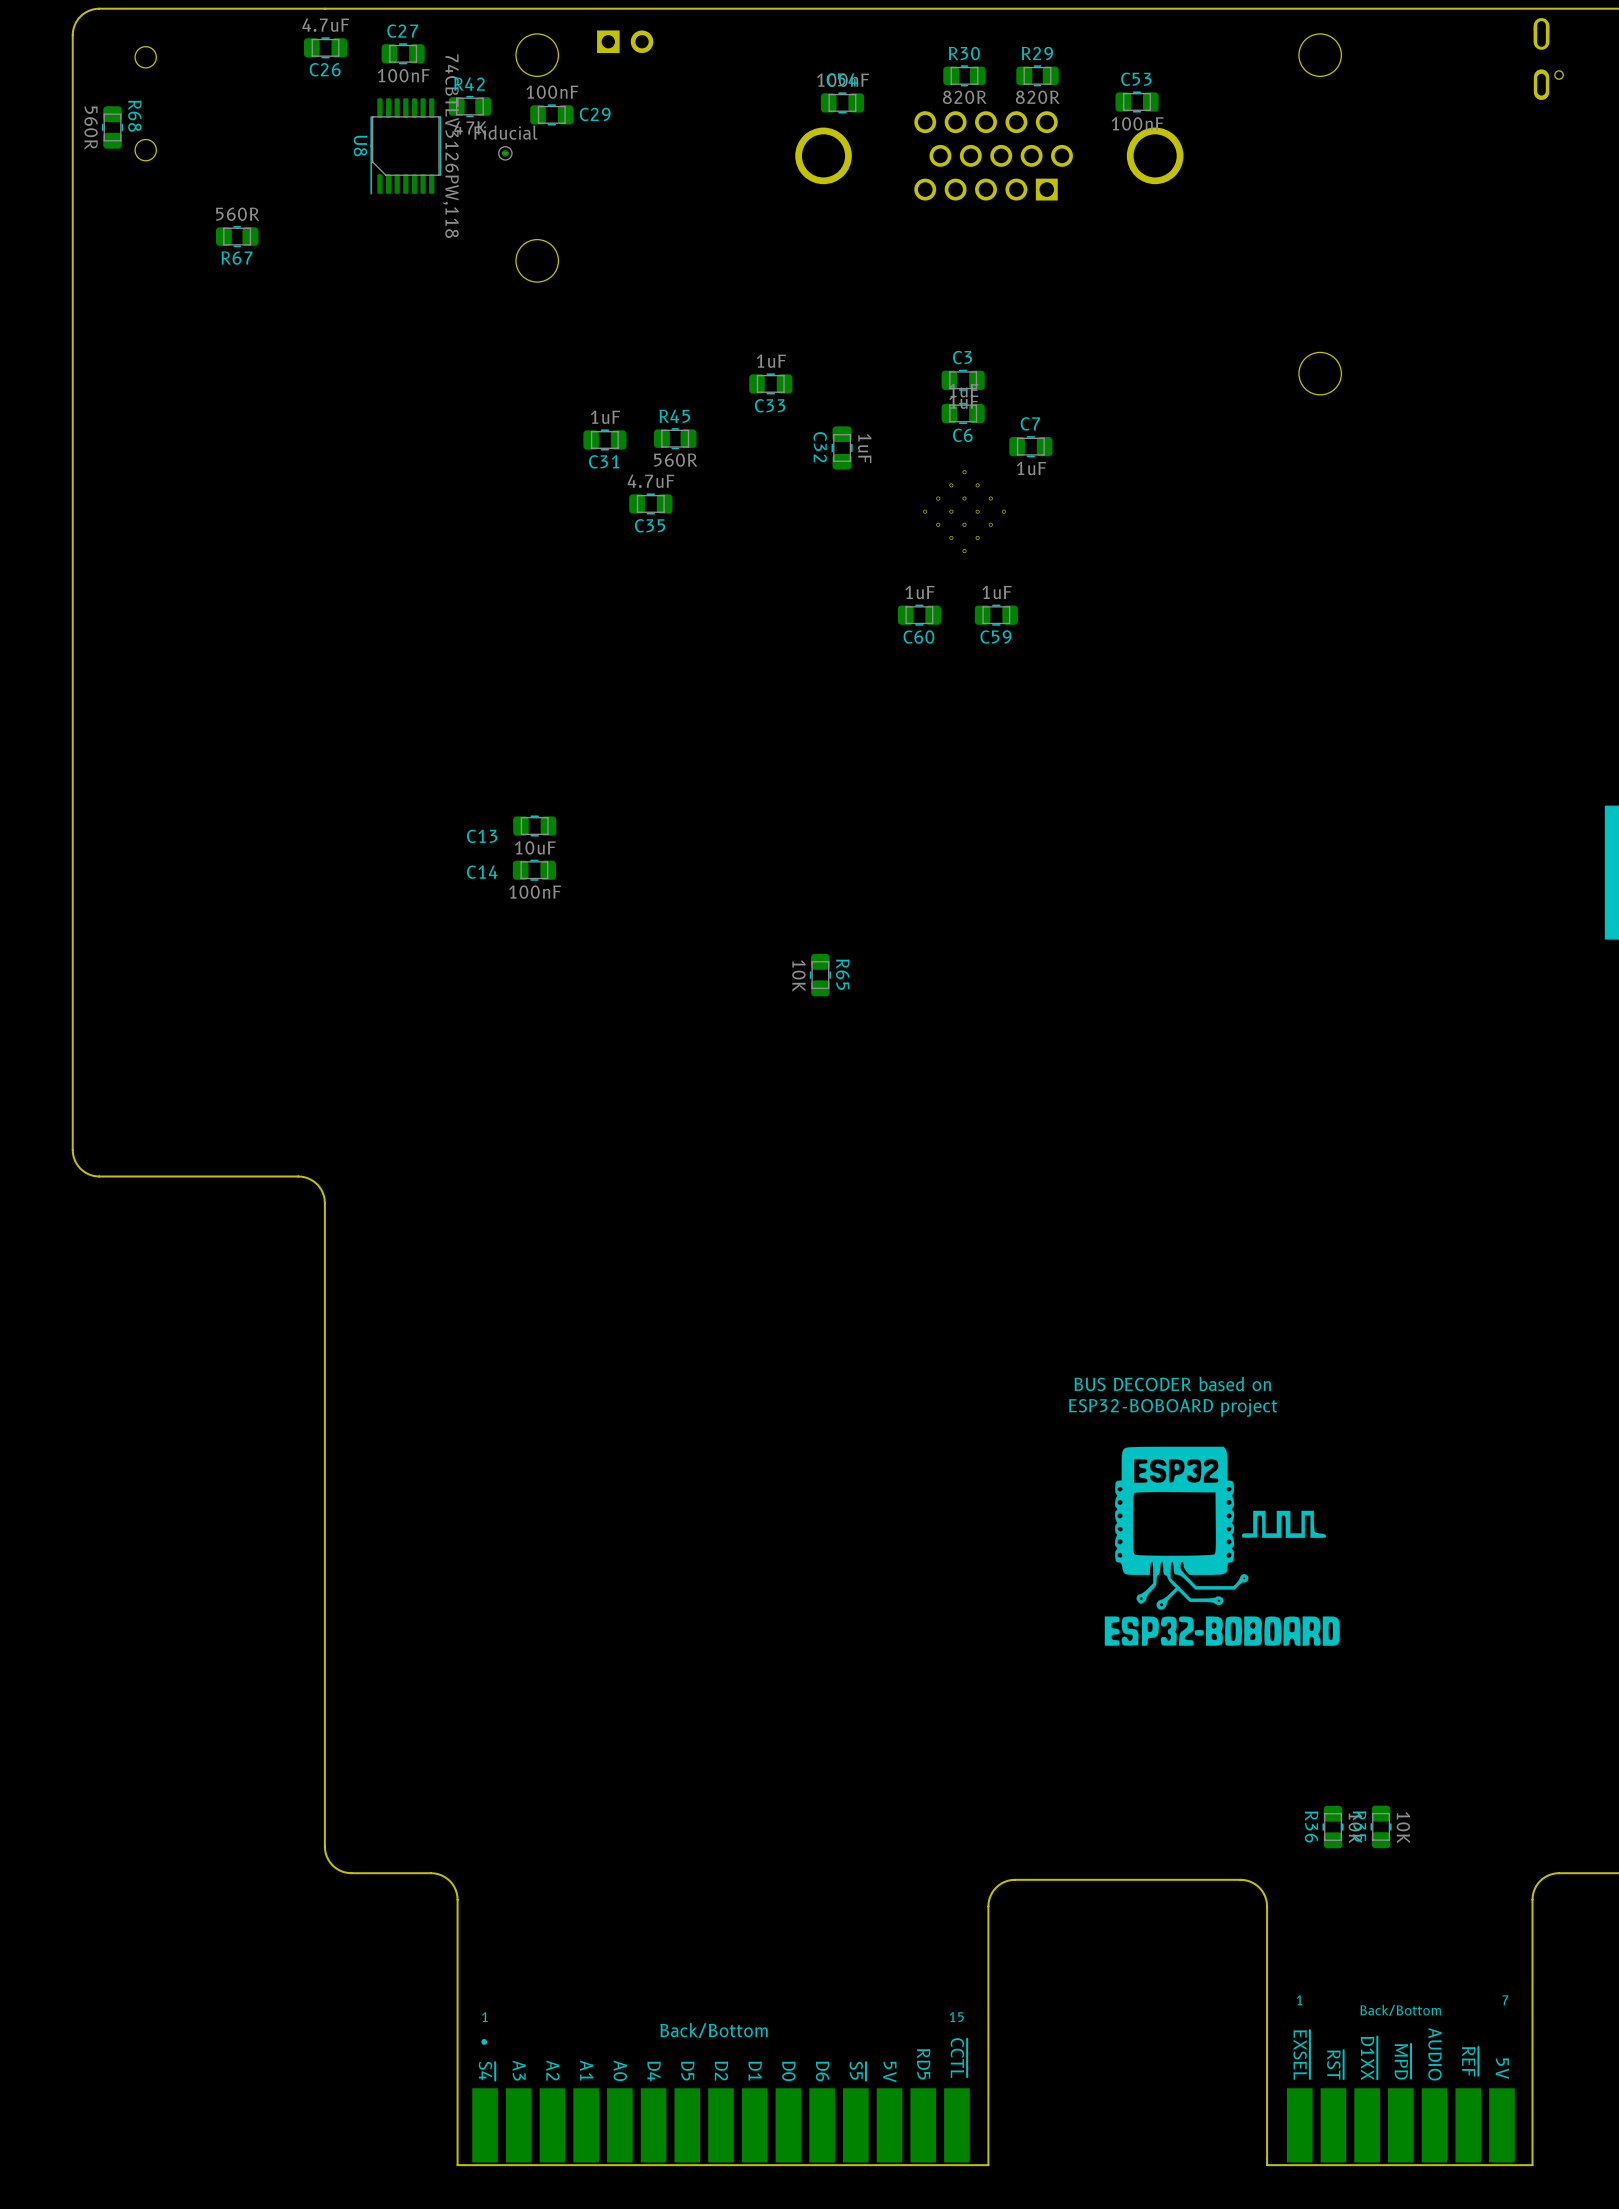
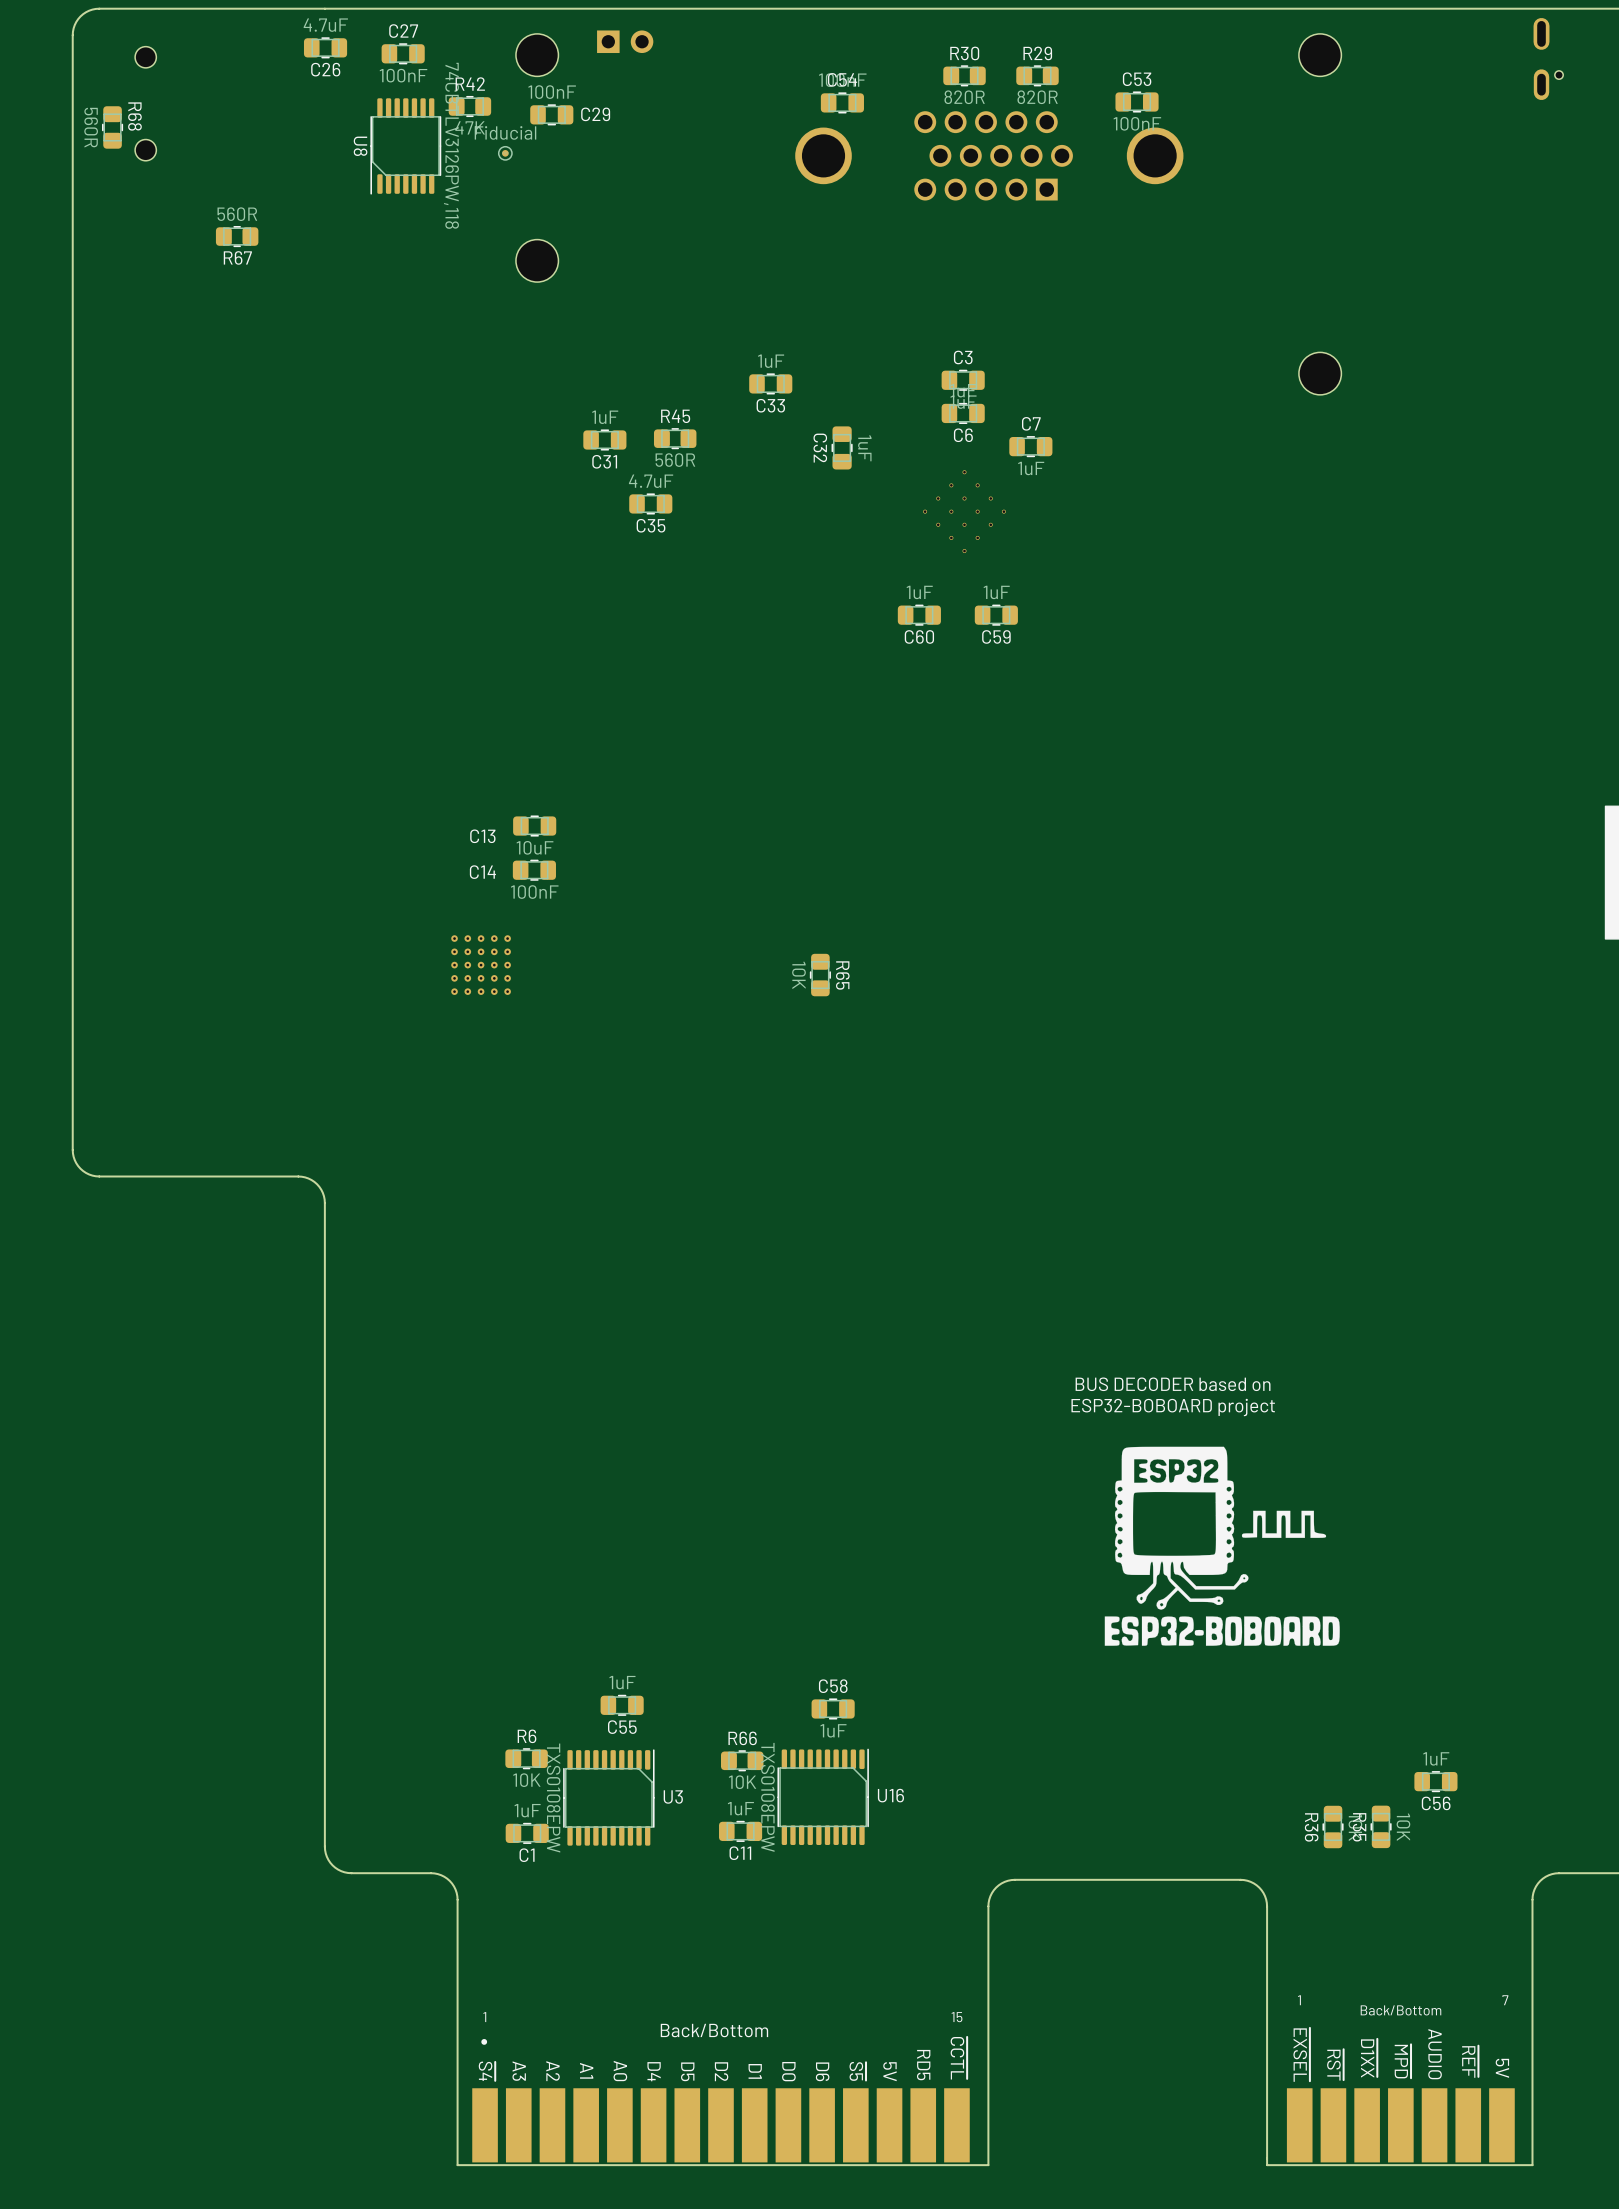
part: none -> (481, 965)
C55: none -> 1uF (622, 1705)
C58: none -> 1uF (833, 1708)
R6: none -> 10K (526, 1758)
R66: none -> 10K (742, 1760)
C56: none -> 1uF (1435, 1781)
U16: none -> TXS0108EPW (823, 1796)
U3: none -> TXS0108EPW (608, 1797)
C11: none -> 1uF (740, 1831)
C1: none -> 1uF (527, 1833)

